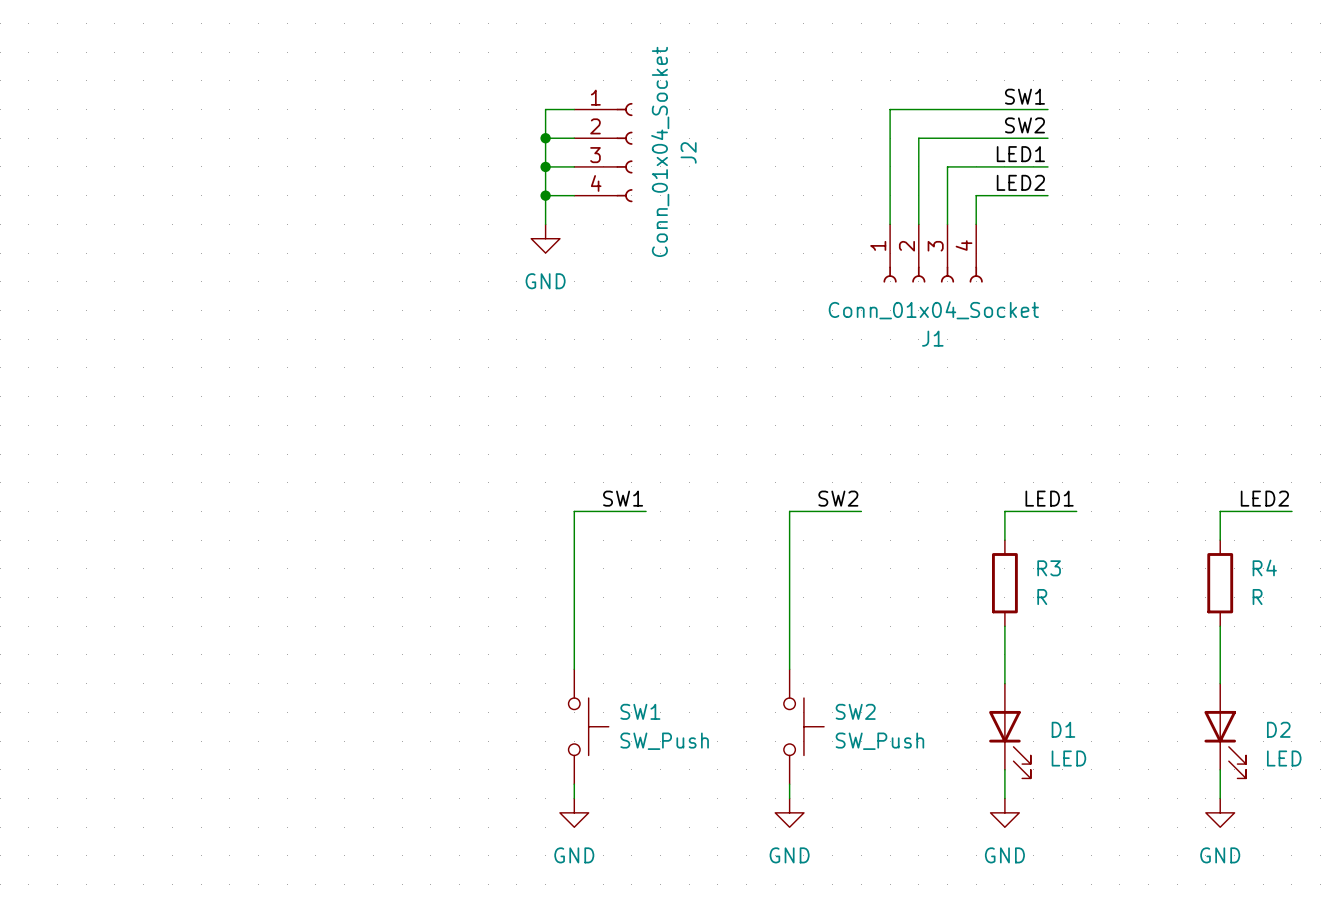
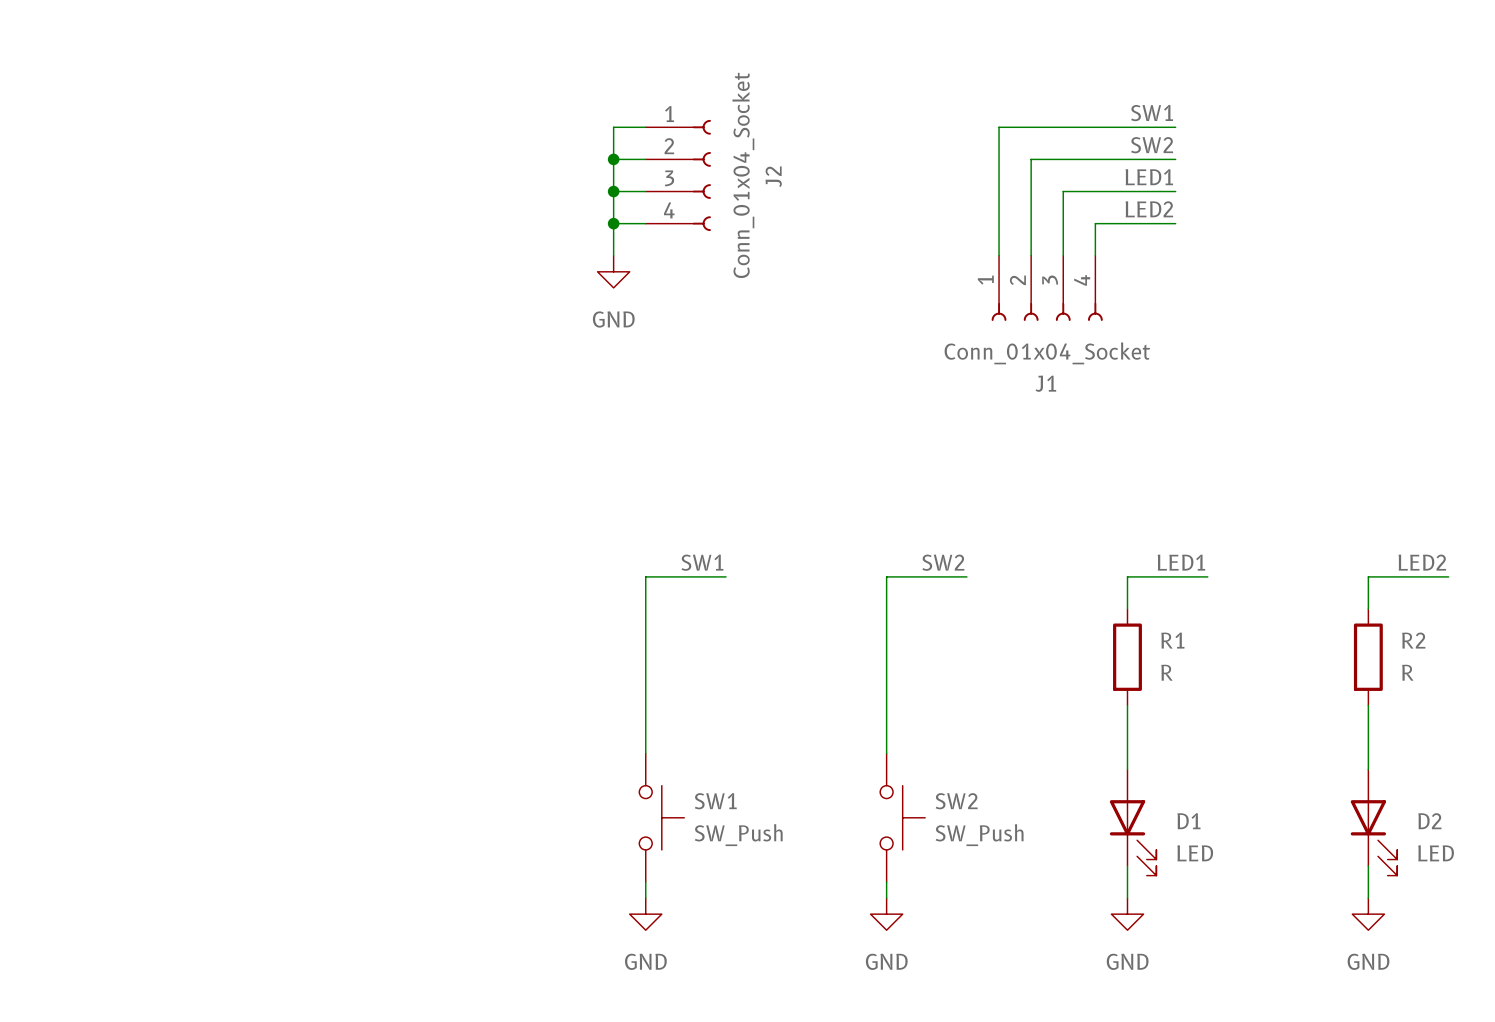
R4 name: R4 (1264, 567) -> R2 (1413, 640)
R3 name: R3 (1049, 568) -> R1 (1172, 640)

